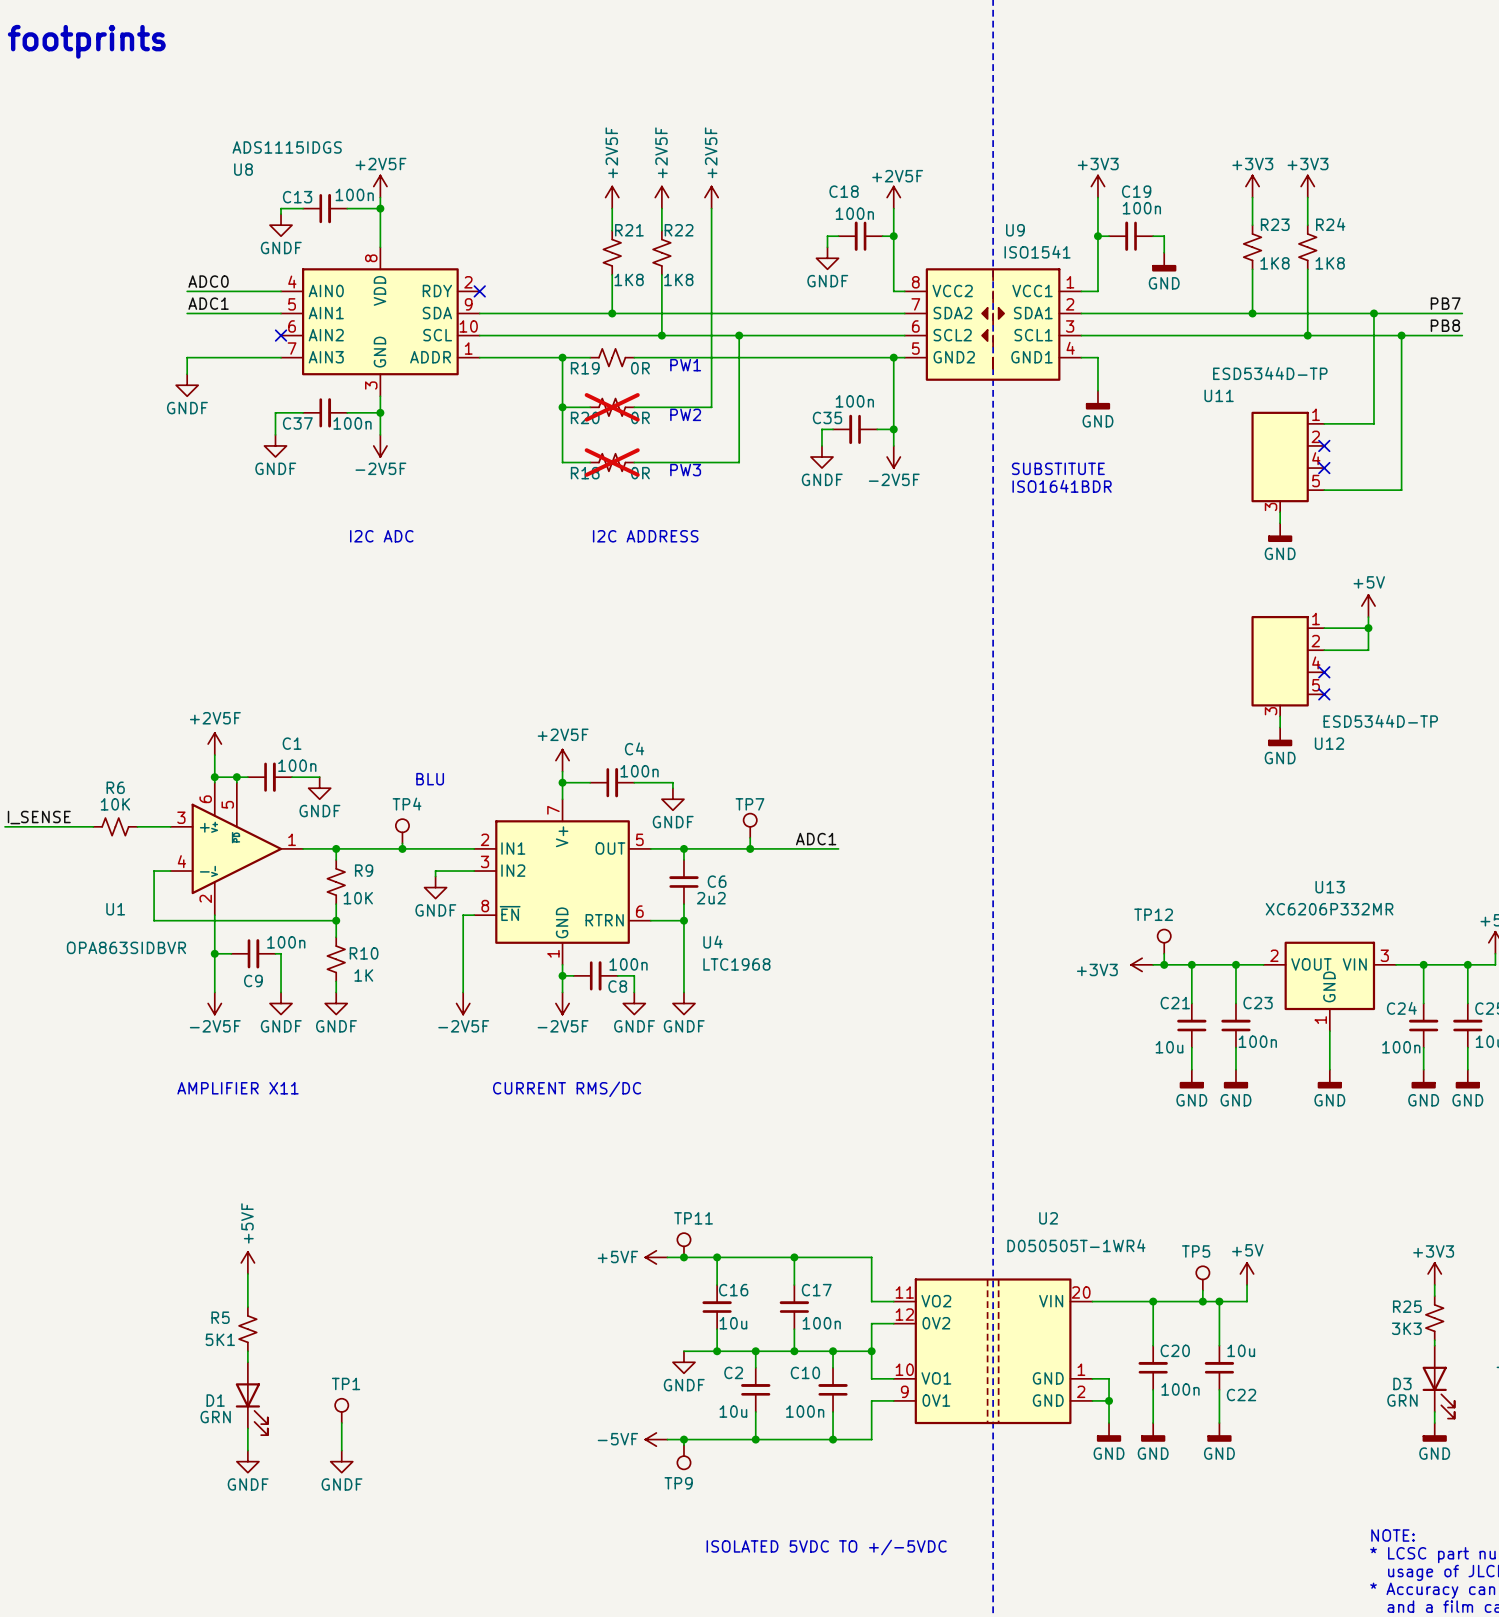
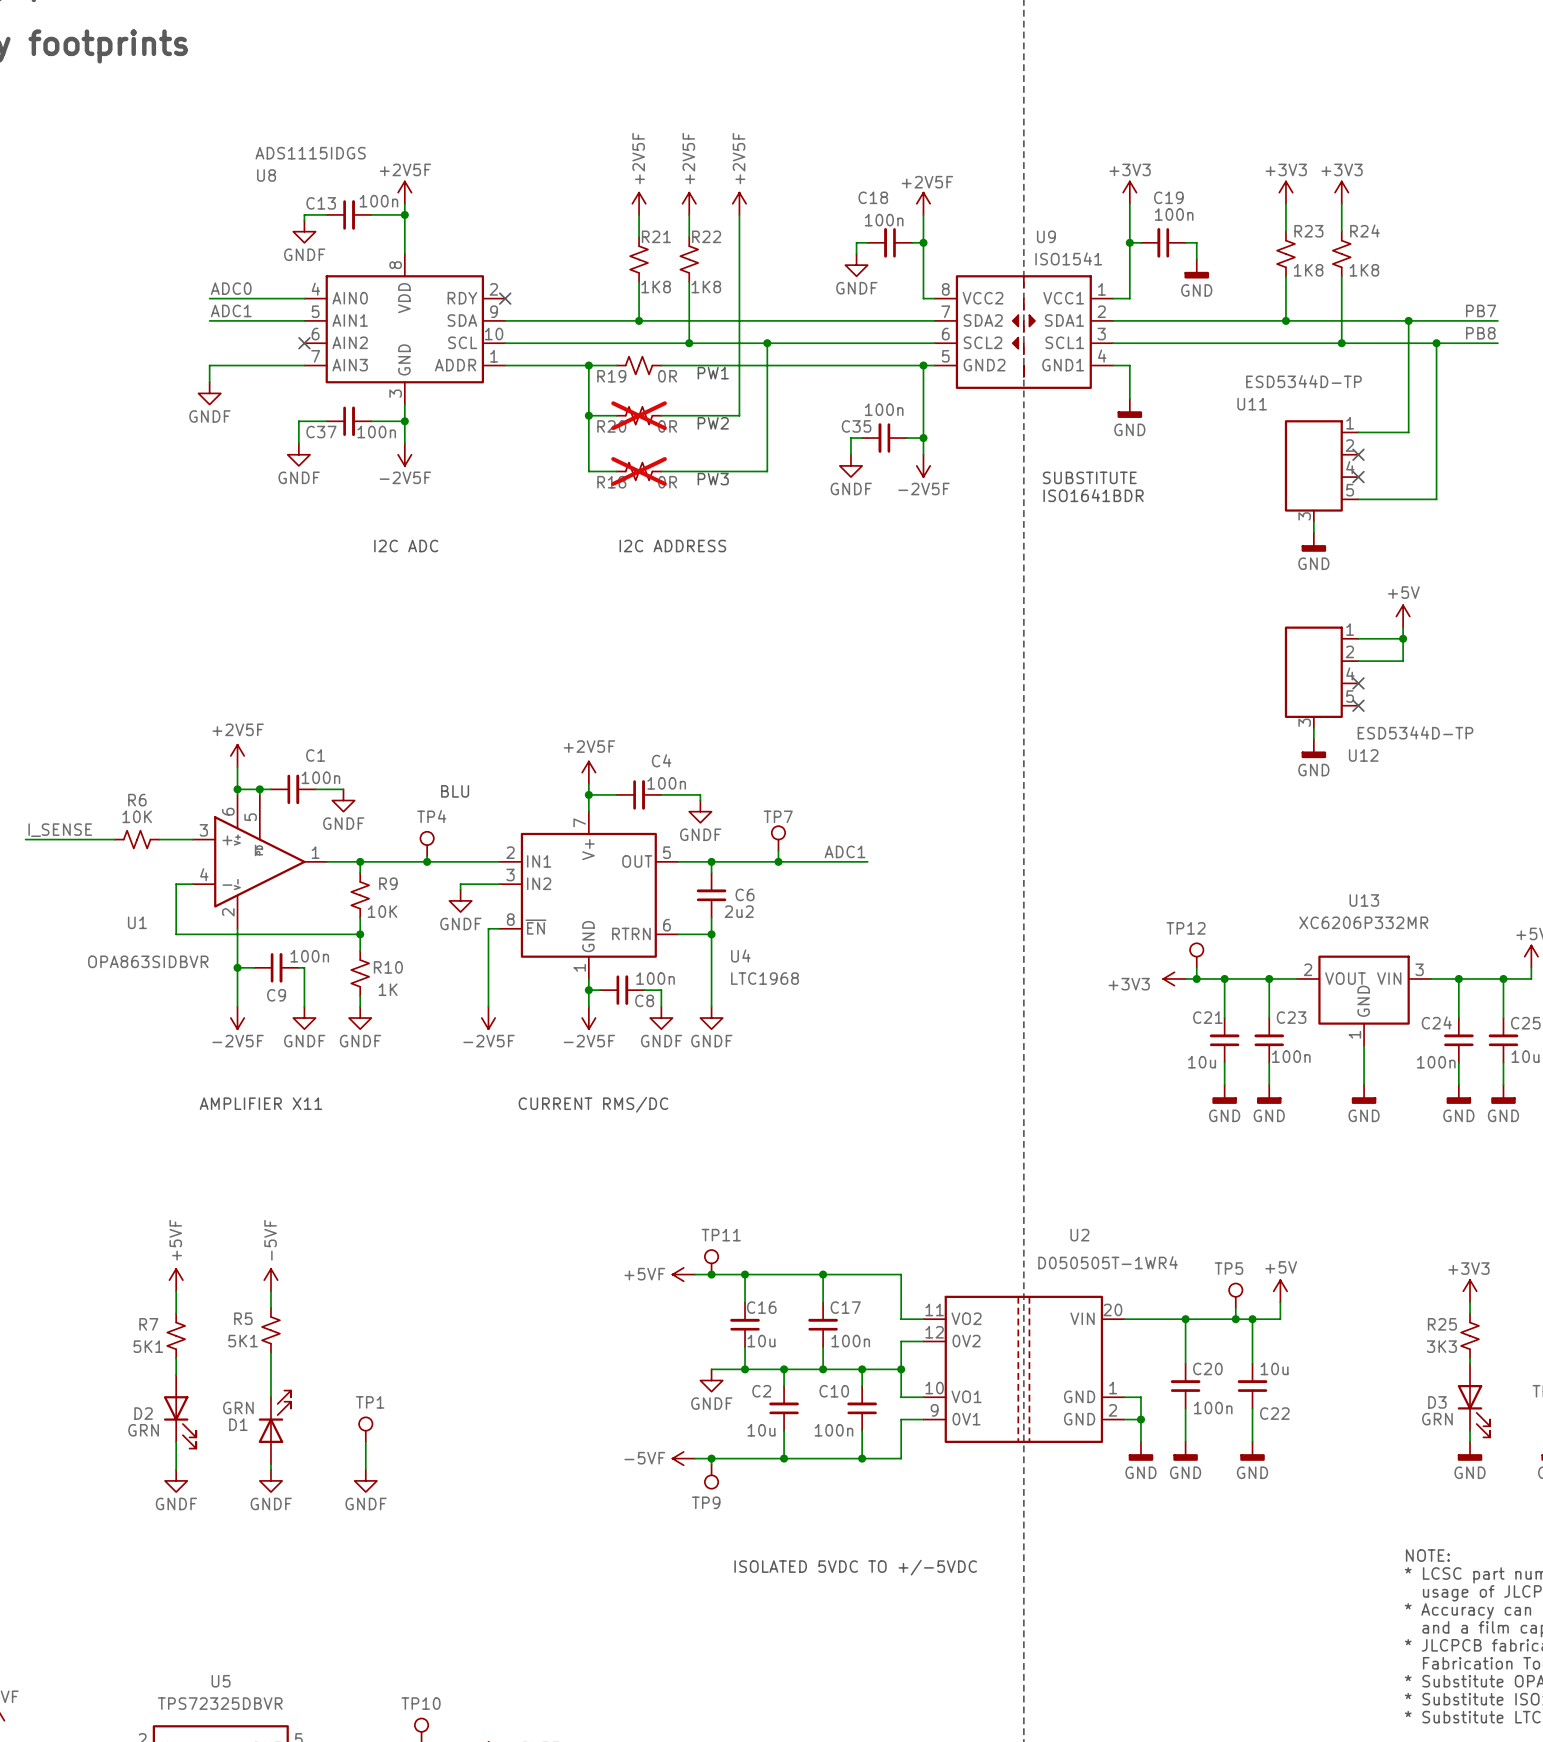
power symbol: none -> +5VF (176, 1280)
power symbol: +5VF (247, 1262) -> -5VF (270, 1280)
wire: none -> (176, 1291) (176, 1313)
R7: none -> 5K1 (176, 1335)
R5 position: (247, 1329) -> (270, 1330)
wire: none -> (176, 1358) (176, 1374)
D2: none -> GRN (180, 1411)
D1 flip: as is (251, 1409) -> up-down (274, 1416)
wire: none -> (176, 1441) (176, 1469)
power symbol: none -> GNDF (176, 1480)

